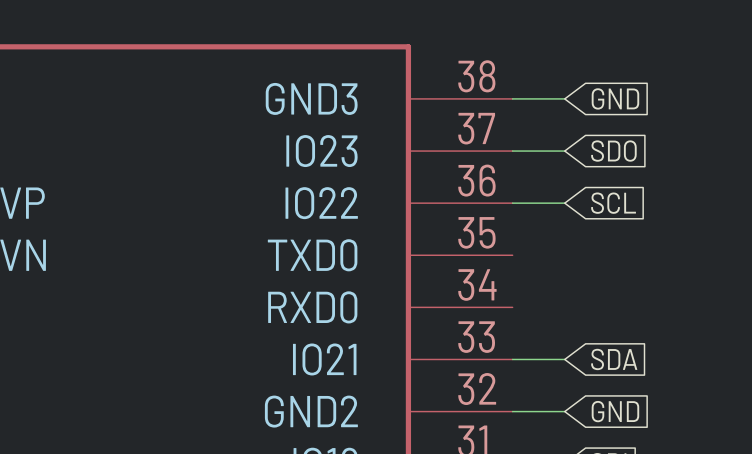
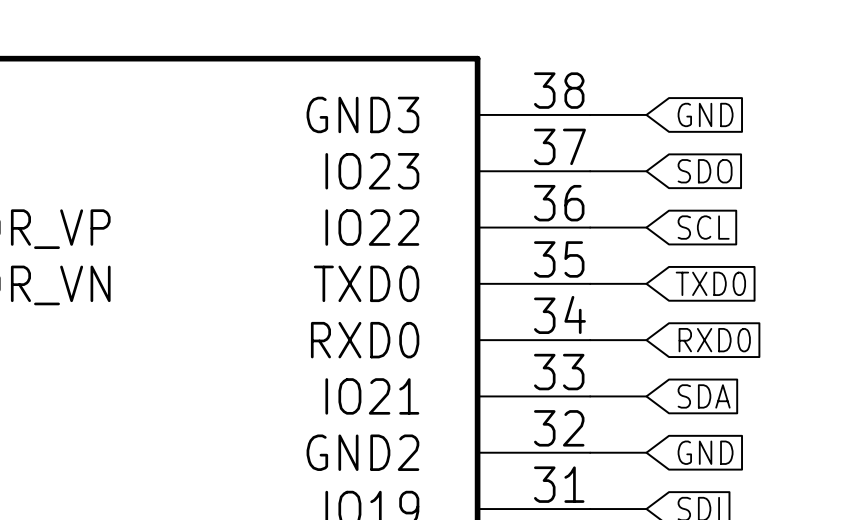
wire: none -> (590, 283) (646, 283)
global label: none -> TXD0 (710, 283)
wire: none -> (590, 340) (646, 340)
global label: none -> RXD0 (714, 340)

